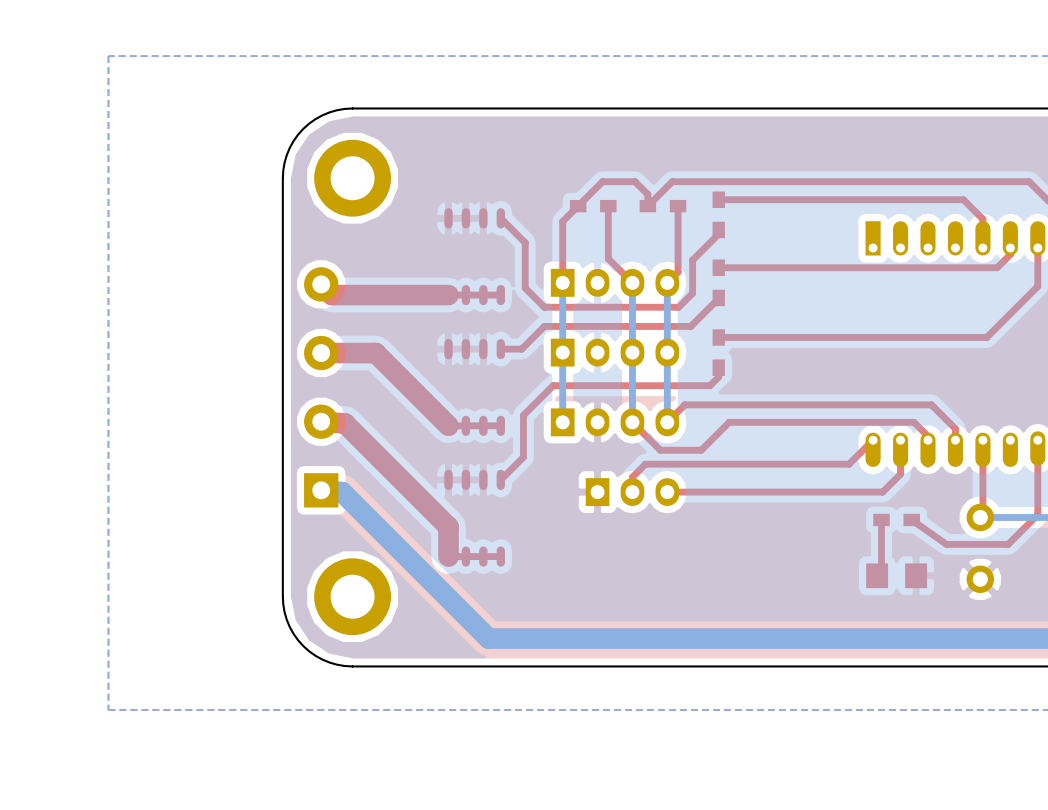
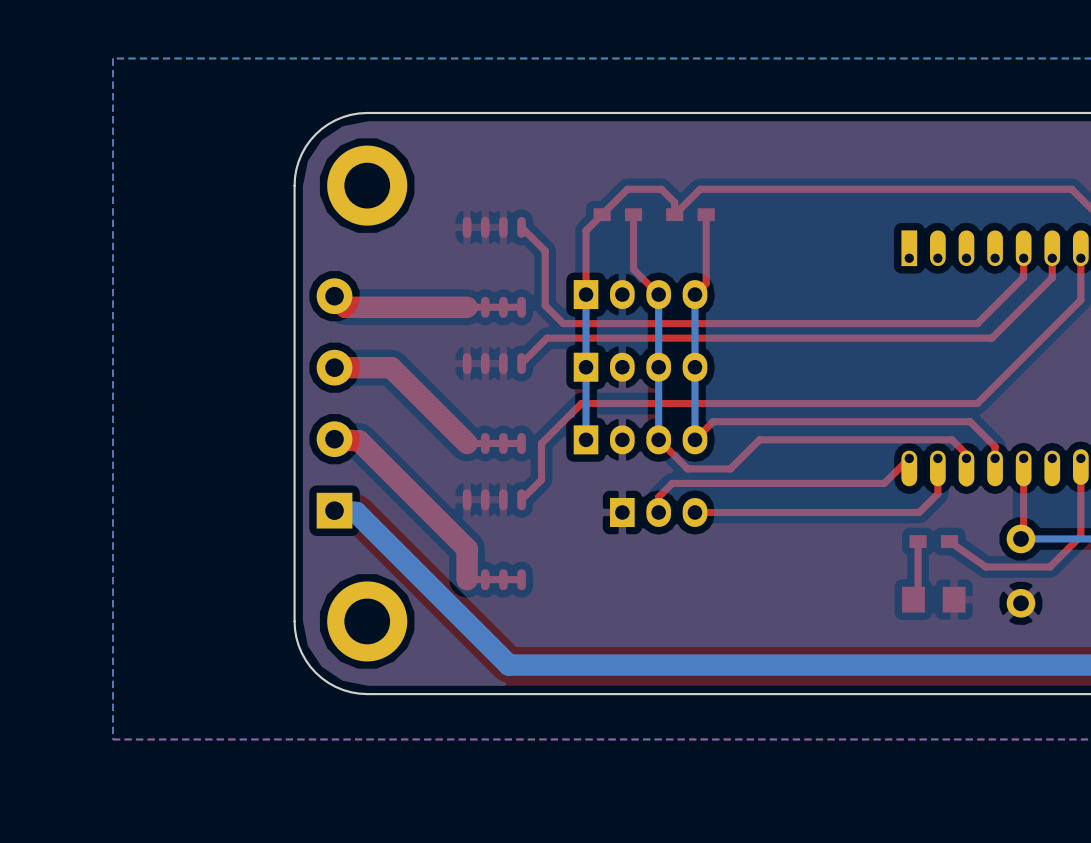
top track: (718, 199) (963, 199) (982, 219) (982, 247) -> (545, 250) (545, 305) (563, 323) (977, 323) (1023, 277) (1023, 258)
part: (718, 214) -> none
top track: (718, 229) (718, 234) (692, 260) (692, 293) (678, 307) (544, 307) (525, 288) (525, 242) (523, 241) -> none
top track: (1010, 254) (997, 267) (718, 267) -> (1052, 265) (1052, 277) (991, 338) (546, 338) (521, 363)
part: (718, 282) -> none
top track: (1037, 286) (986, 337) (718, 337) -> (1080, 298) (977, 403) (581, 403) (541, 443) (541, 479)
top track: (718, 298) (690, 326) (544, 326) (521, 349) (500, 349) -> none
part: (718, 352) -> none
top track: (718, 367) (718, 377) (710, 385) (553, 385) (523, 415) (523, 457) (519, 460) -> none

